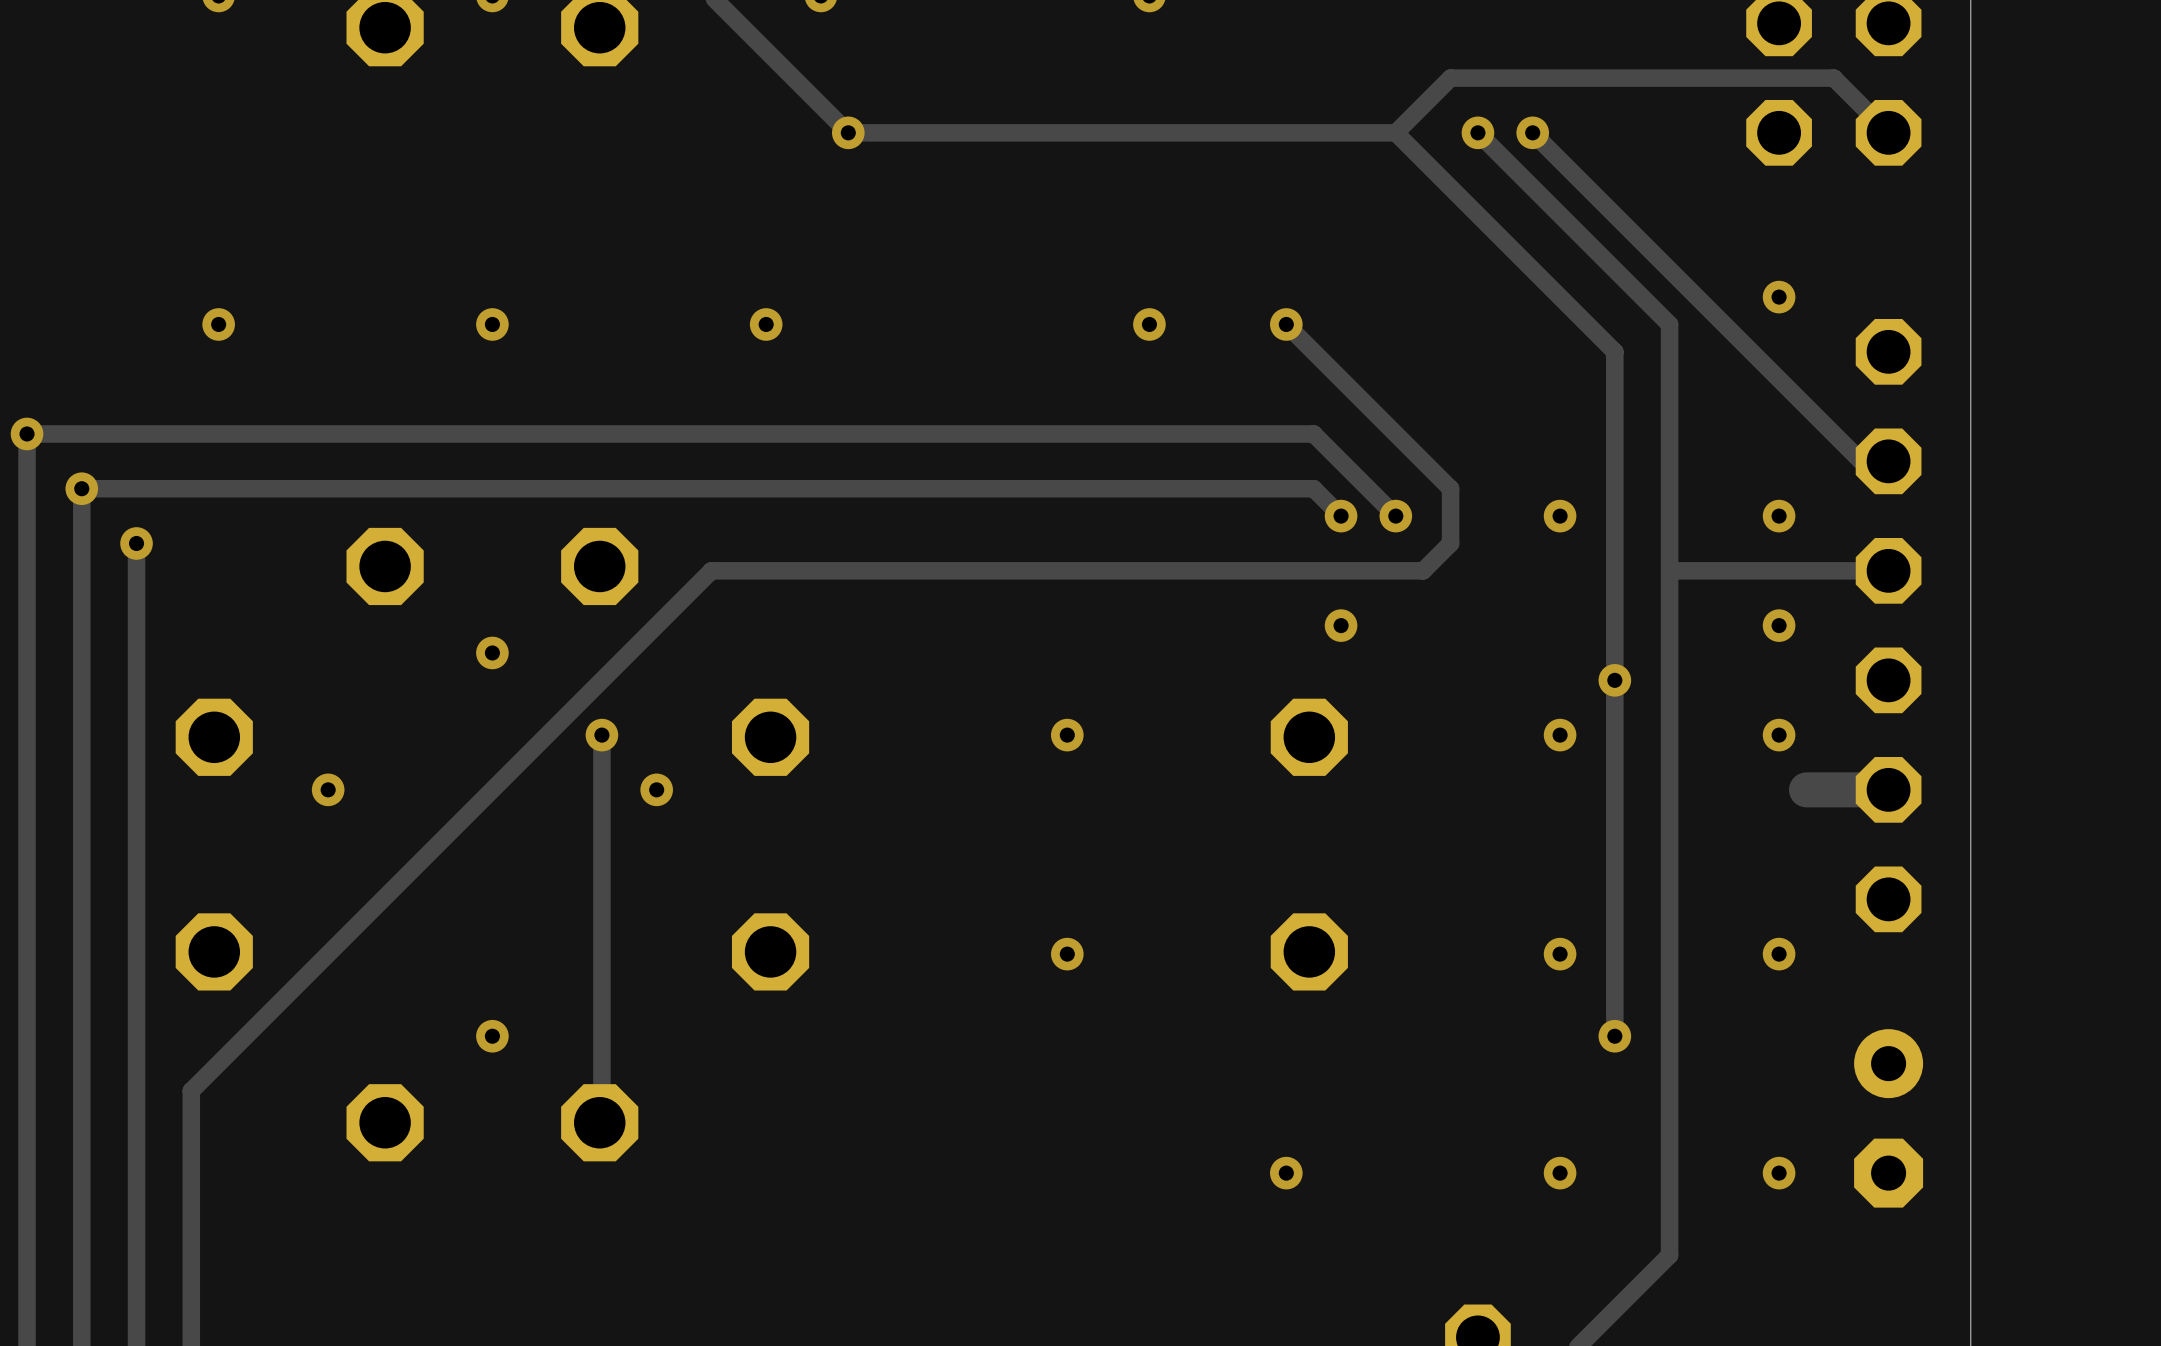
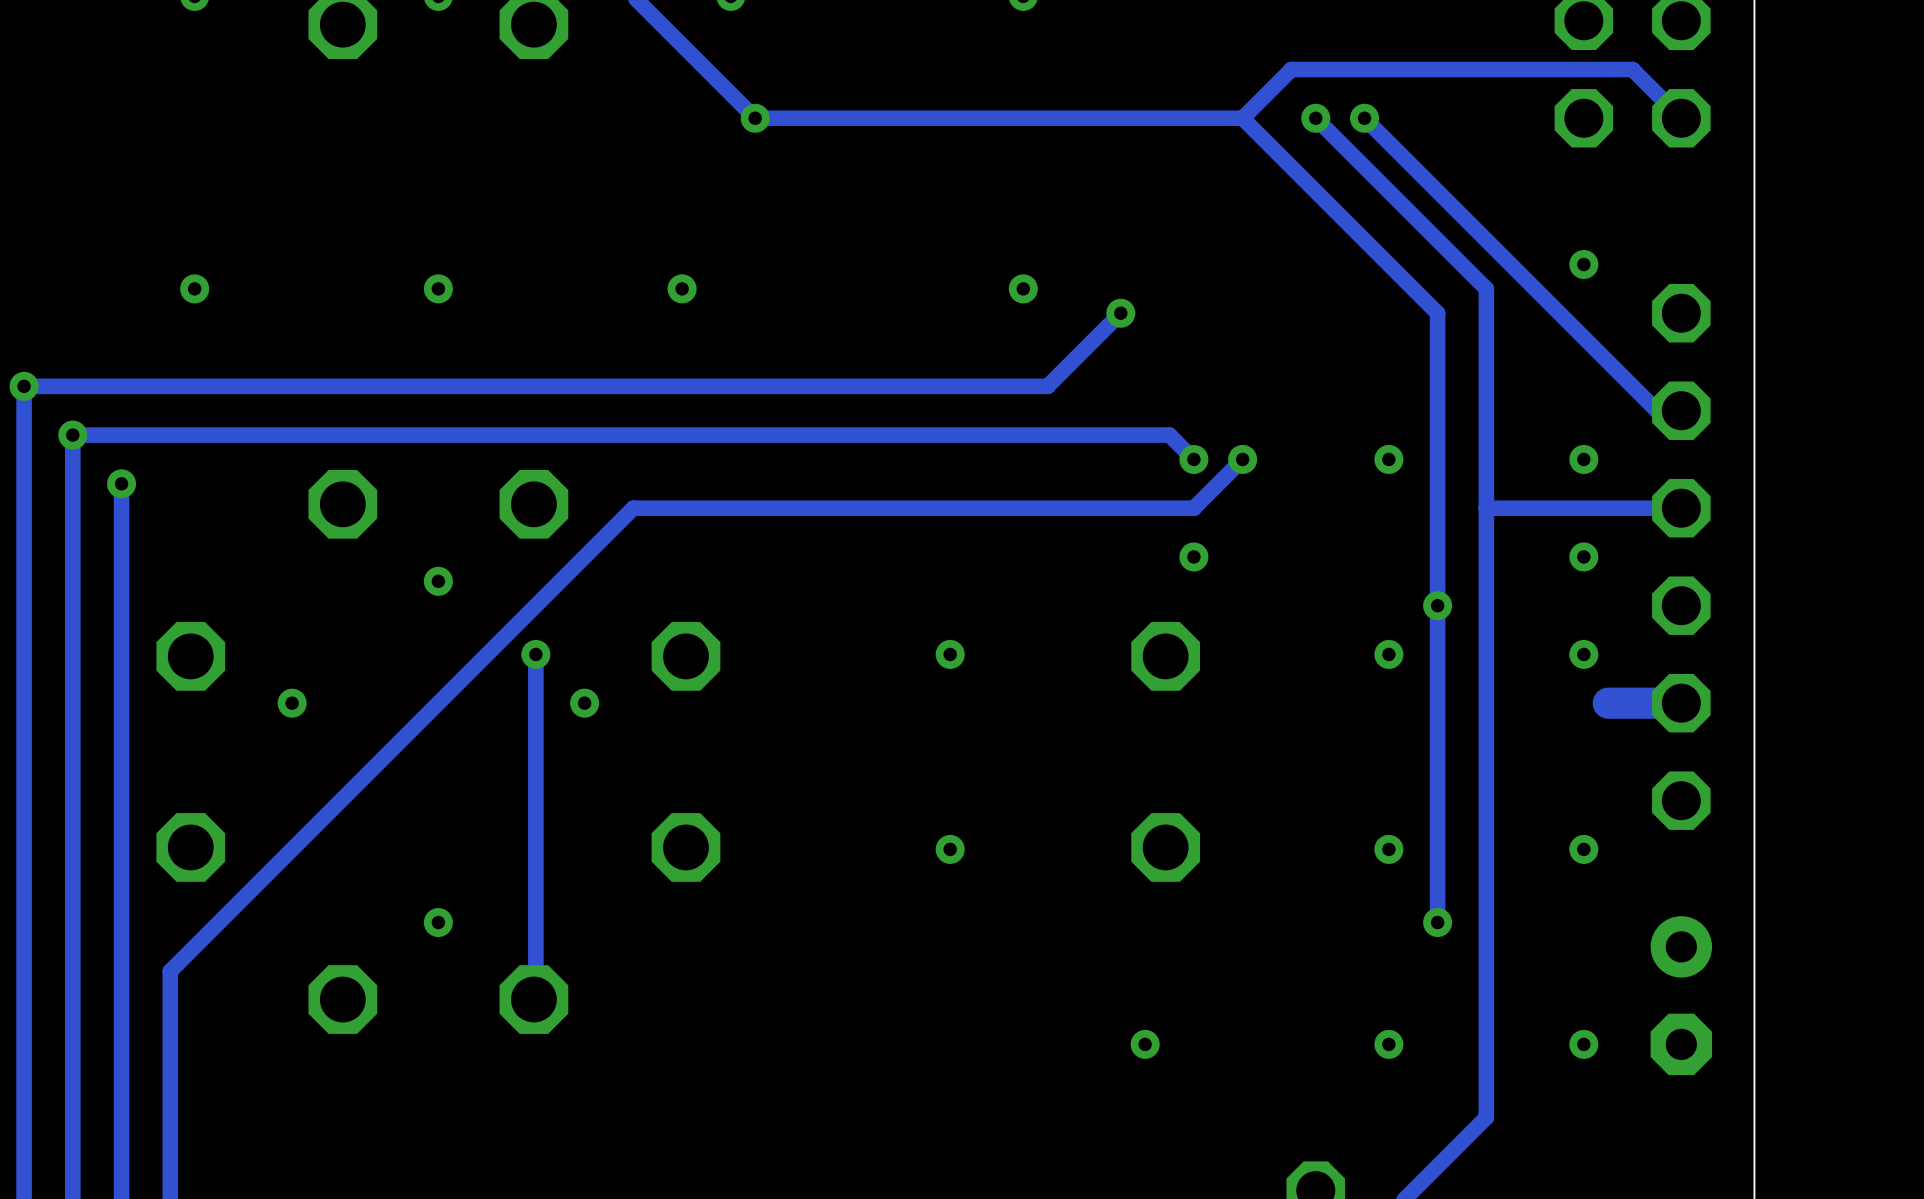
track: (1286, 324) (1450, 488) (1450, 543) (1423, 570) (1341, 570) -> none
via position: (1286, 324) -> (1120, 313)
track: none -> (1120, 313) (1047, 386)
track: (1176, 433) (1313, 433) (1395, 516) -> (1193, 508) (1242, 459)

